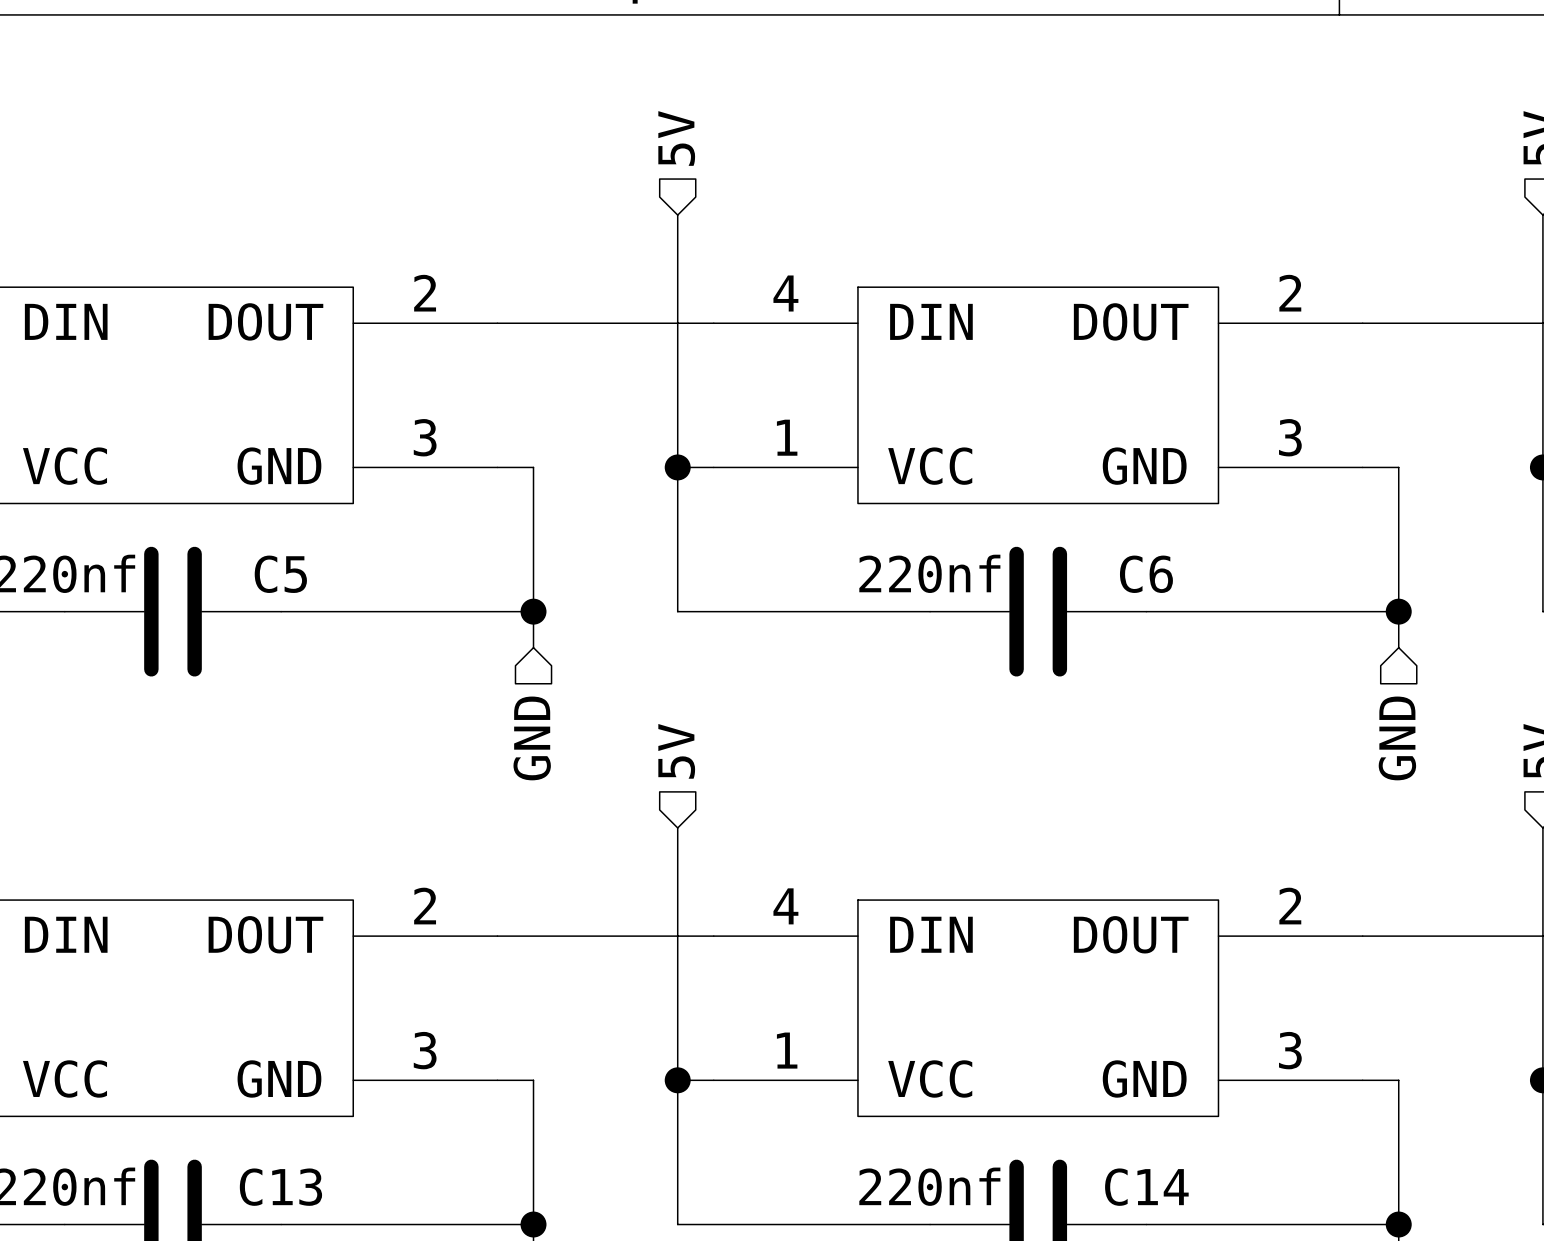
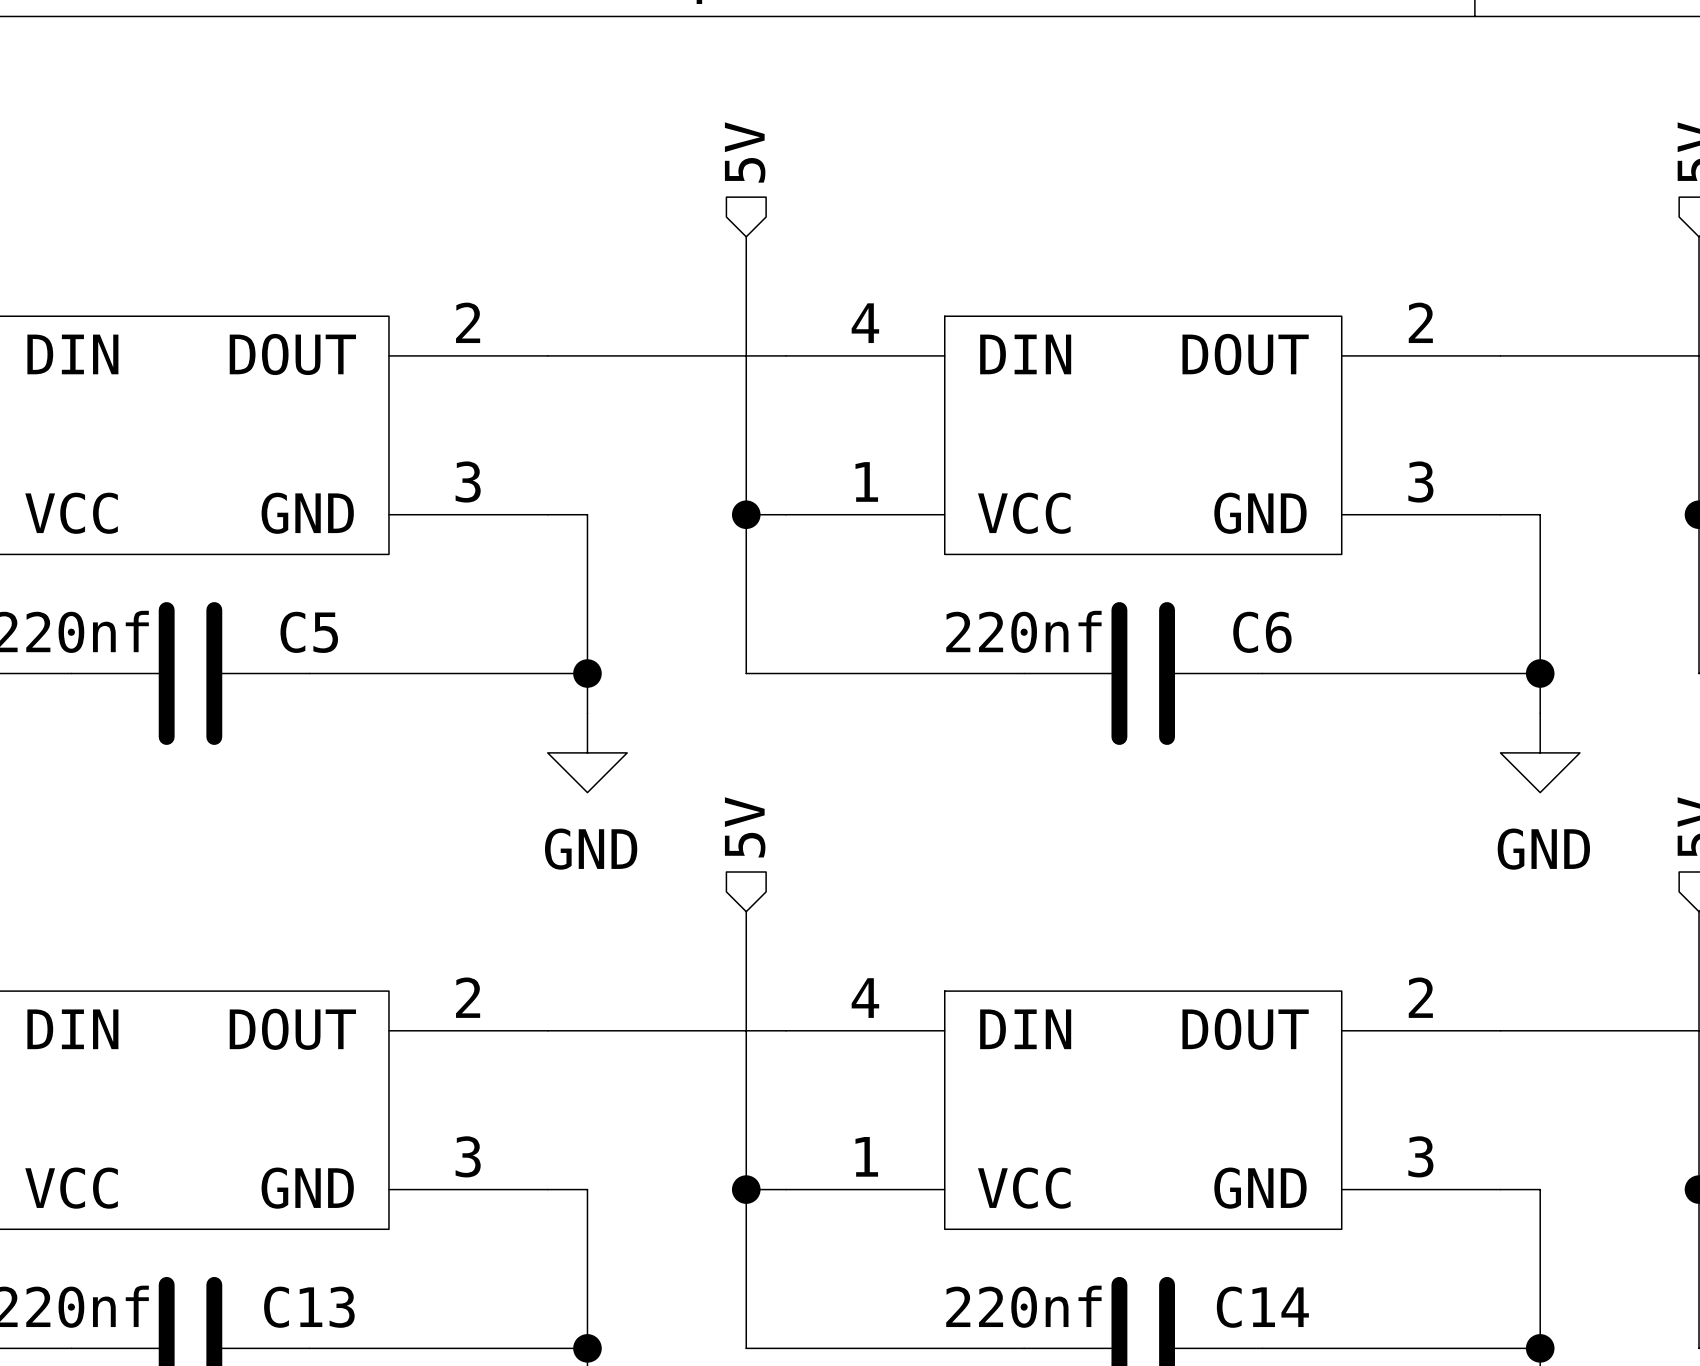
power symbol: none -> GND (587, 752)
power symbol: none -> GND (1540, 752)
hierarchical label: GND (532, 738) -> none
hierarchical label: GND (1397, 738) -> none

